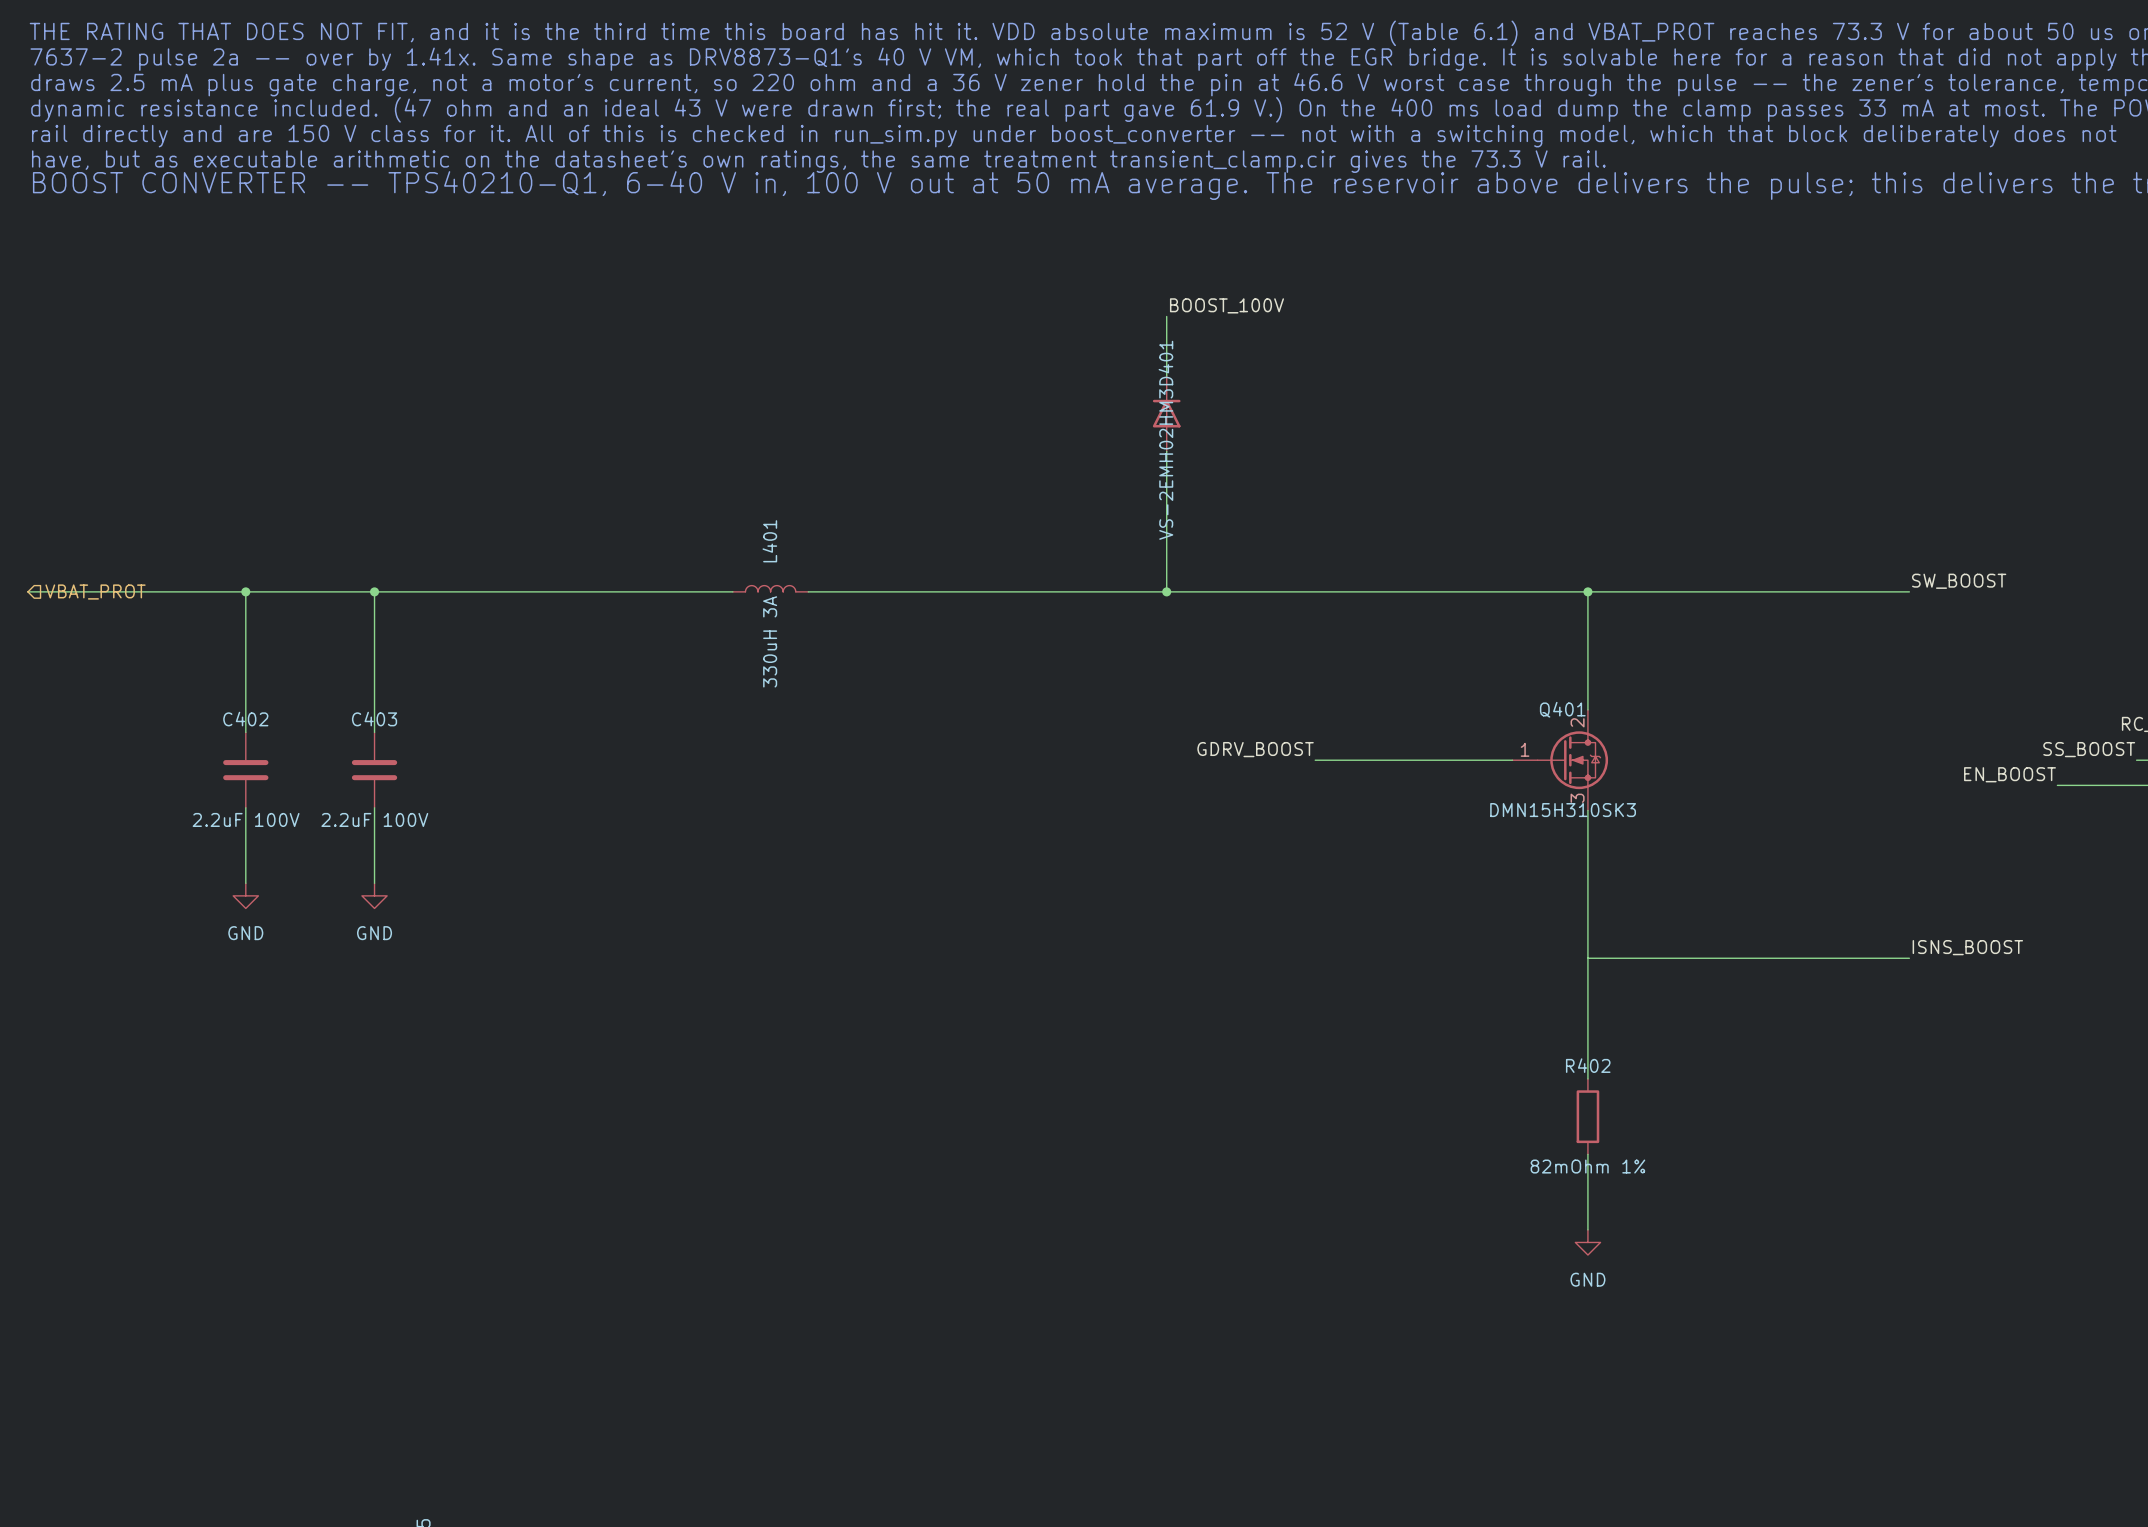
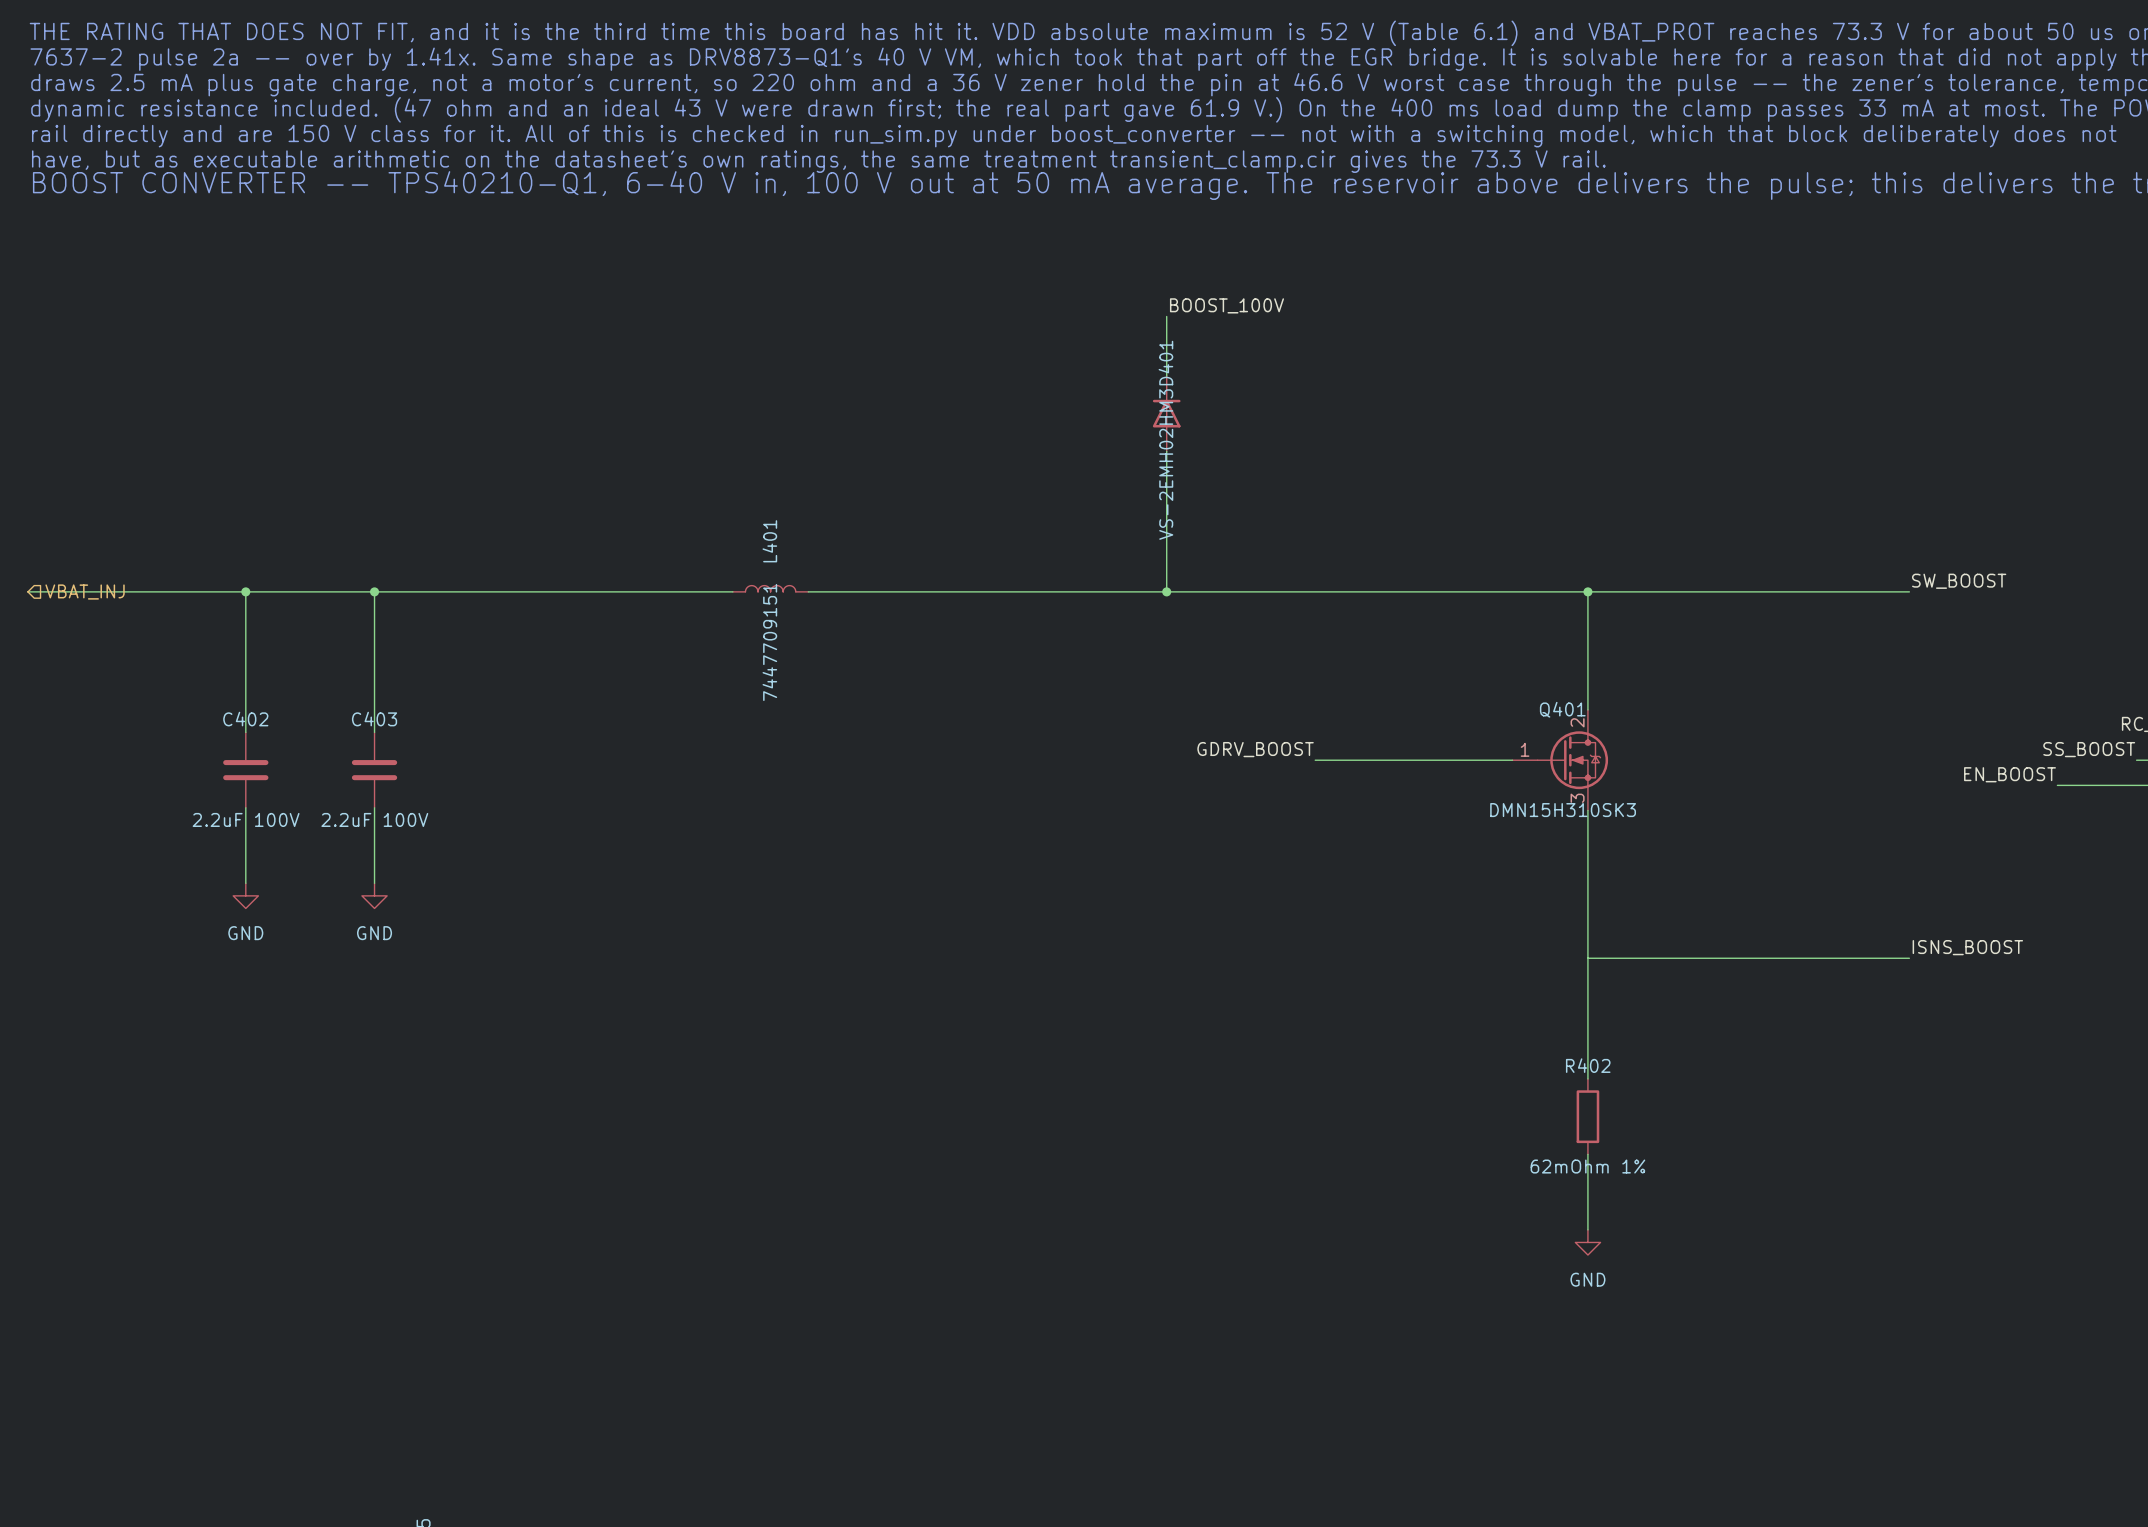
hierarchical label: VBAT_PROT (95, 592) -> VBAT_INJ (85, 592)
L401 value: 330uH 3A (770, 641) -> 7447709151 (769, 642)
R402 value: 82mOhm 1% (1587, 1166) -> 62mOhm 1% (1587, 1166)

